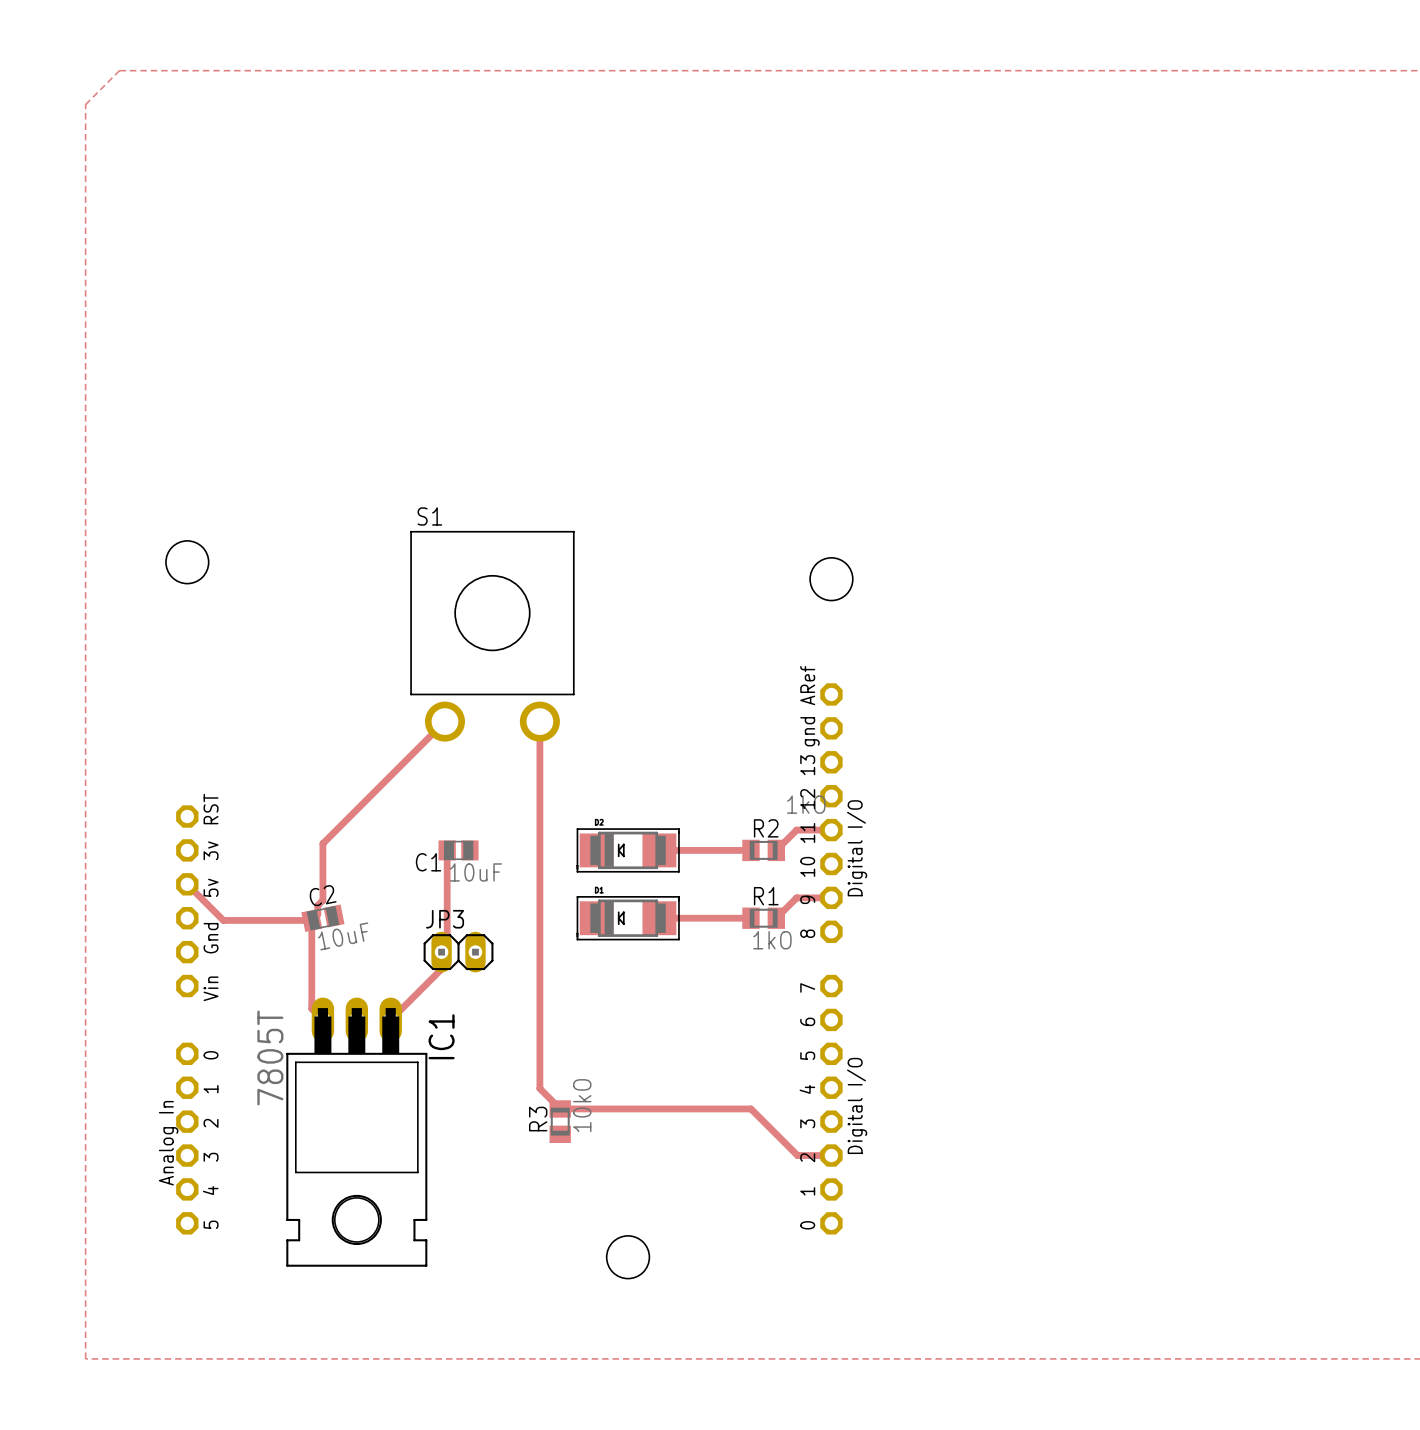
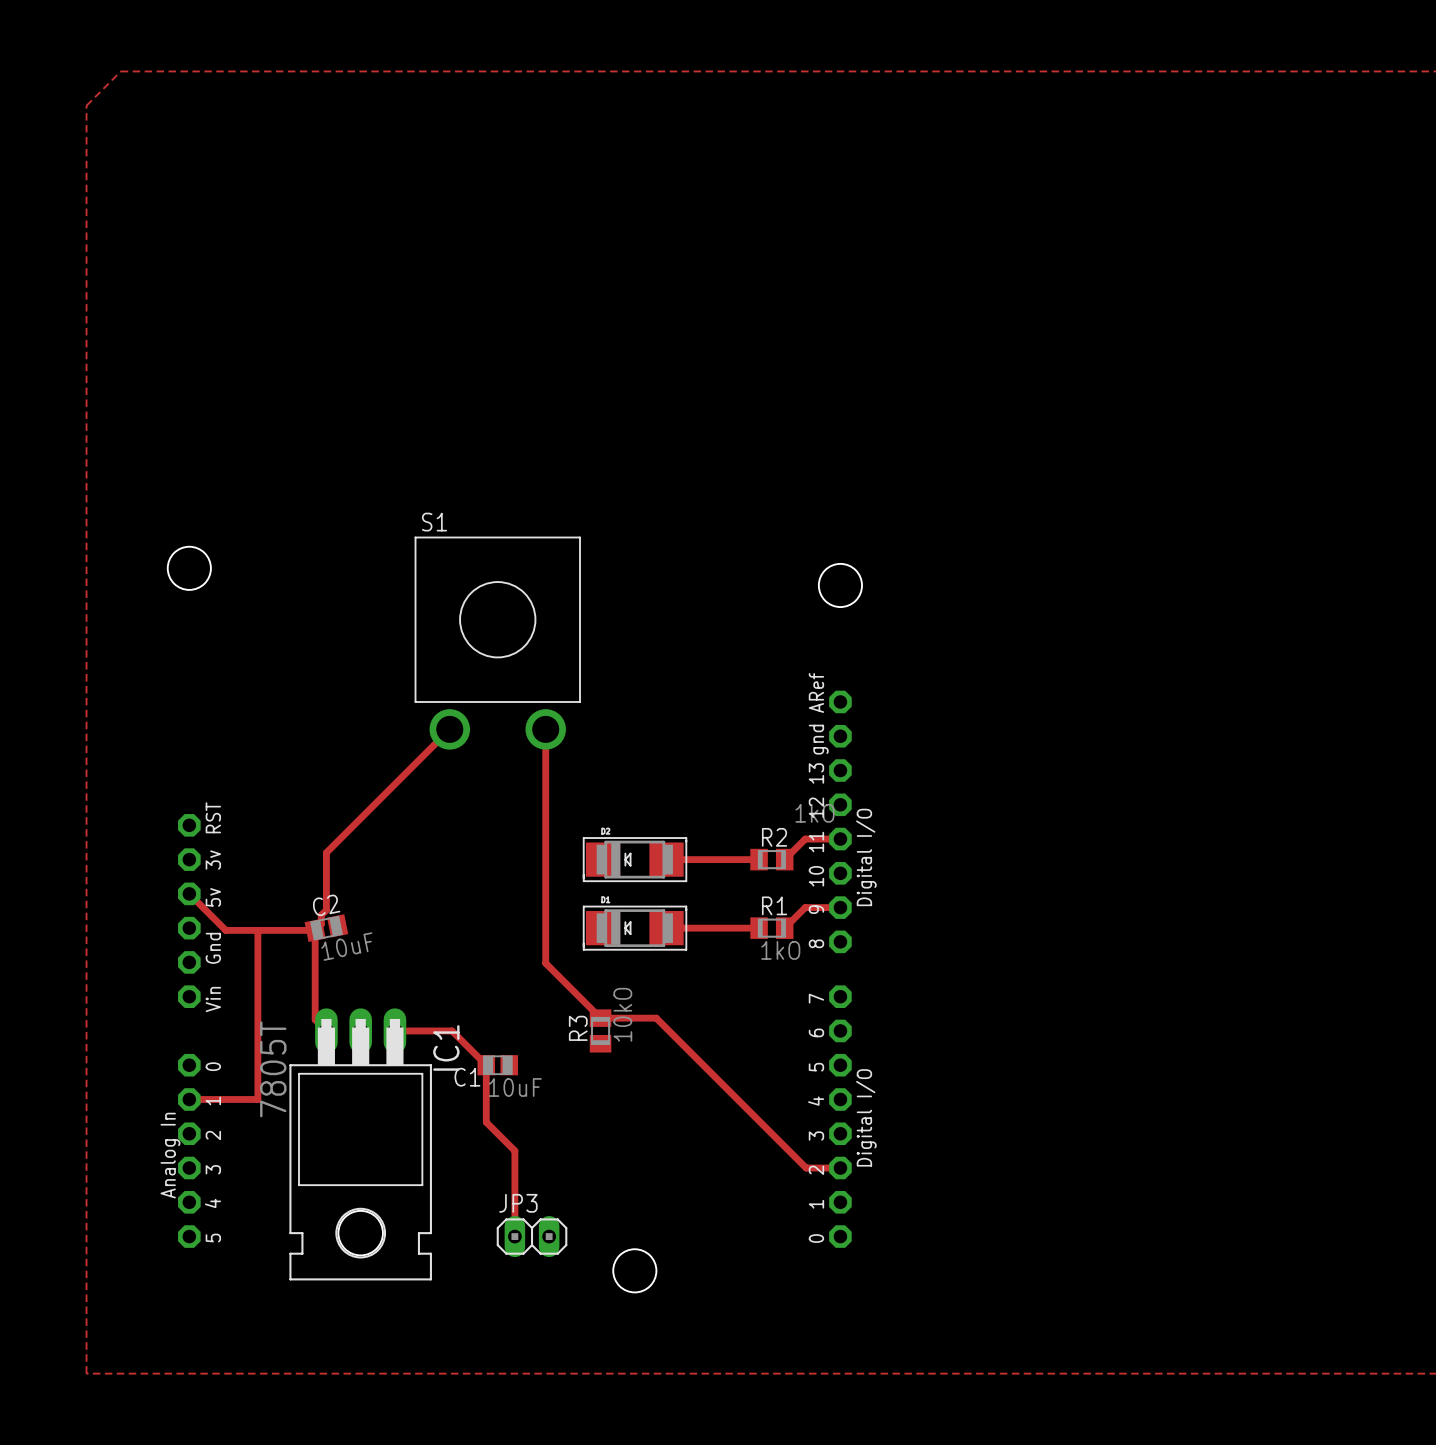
track: (447, 850) (447, 946) (441, 952) (441, 969) (390, 1019) -> (514, 1236) (514, 1150) (486, 1122) (486, 1065) (452, 1030) (394, 1030)
C1 position: (458, 850) -> (497, 1065)
track: none -> (257, 930) (257, 1099) (189, 1099)
JP3 position: (458, 952) -> (532, 1236)
track: (539, 953) (539, 1088) (560, 1108) (750, 1108) -> (545, 963) (600, 1018) (656, 1018) (759, 1120)
R3 position: (560, 1121) -> (600, 1030)

